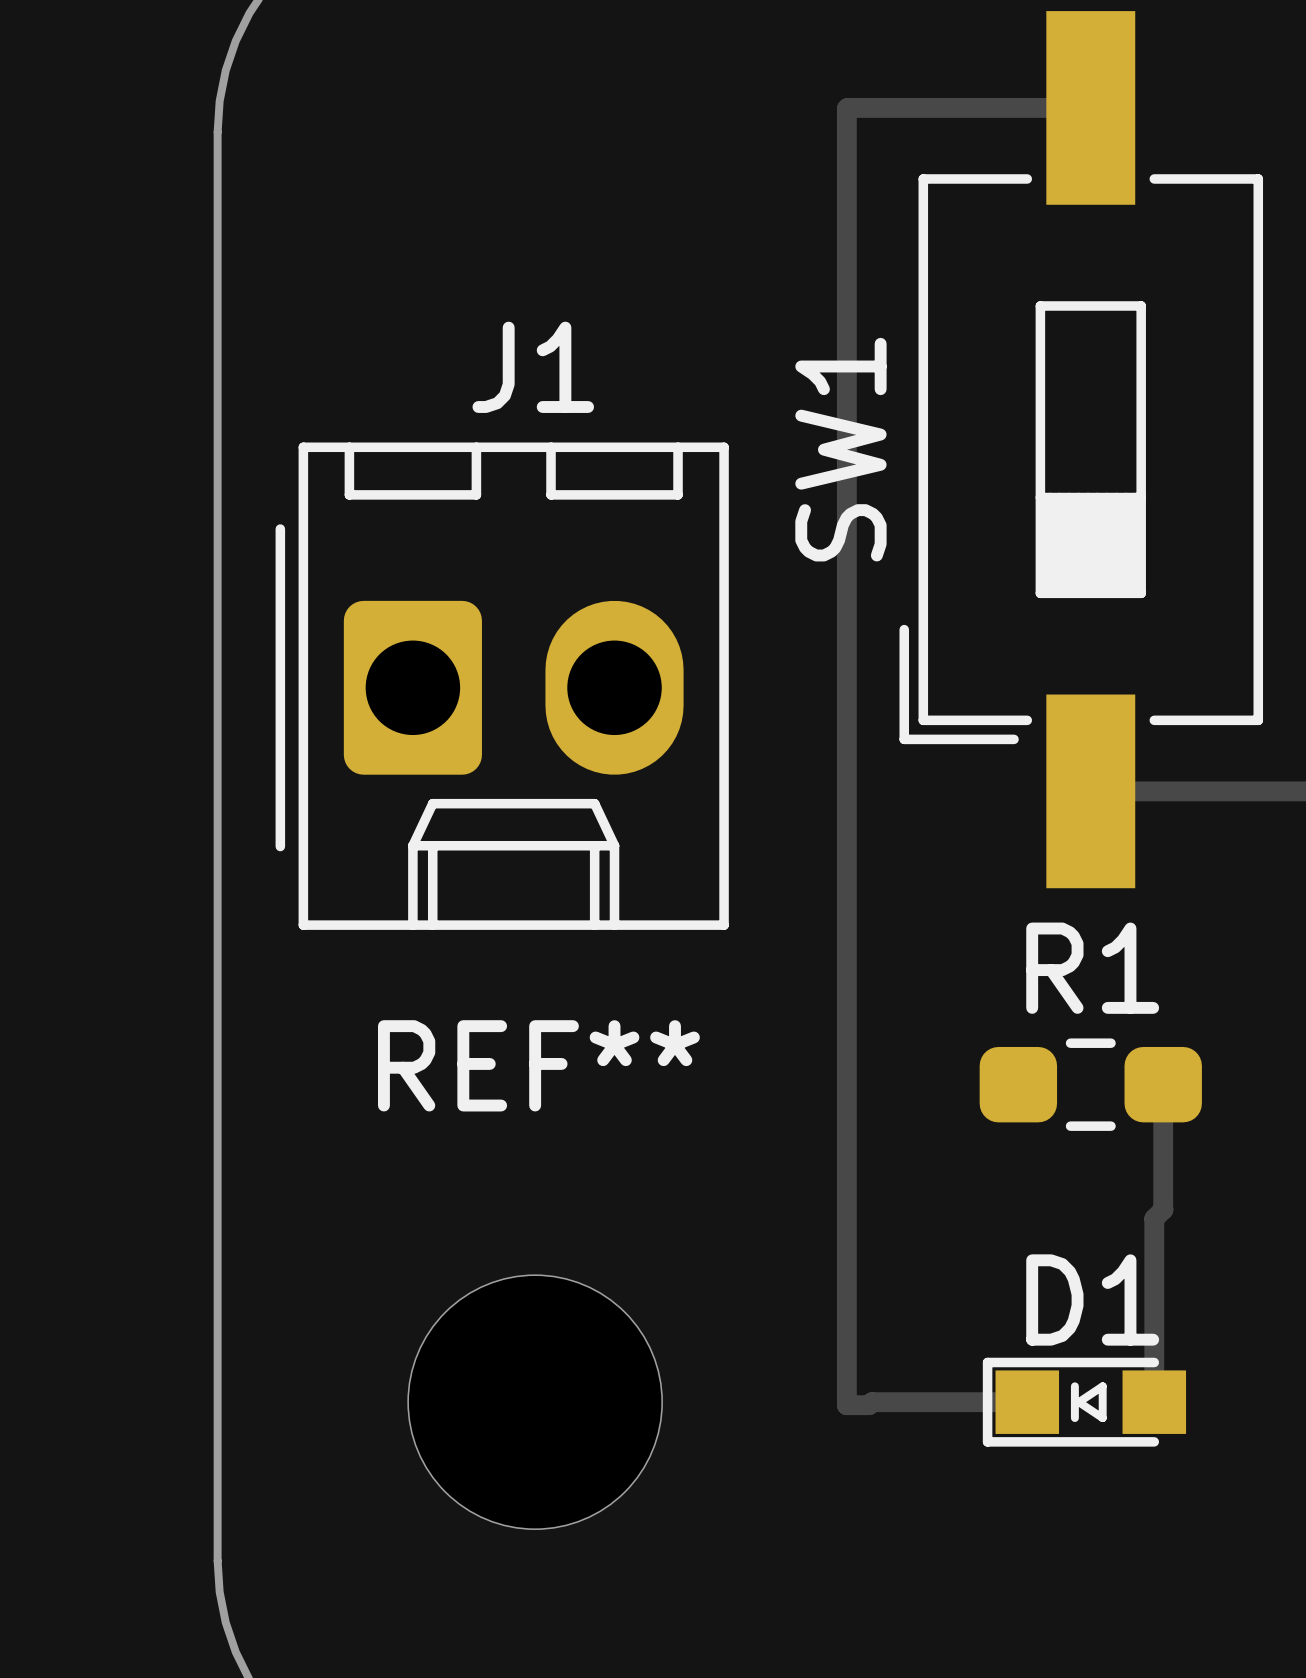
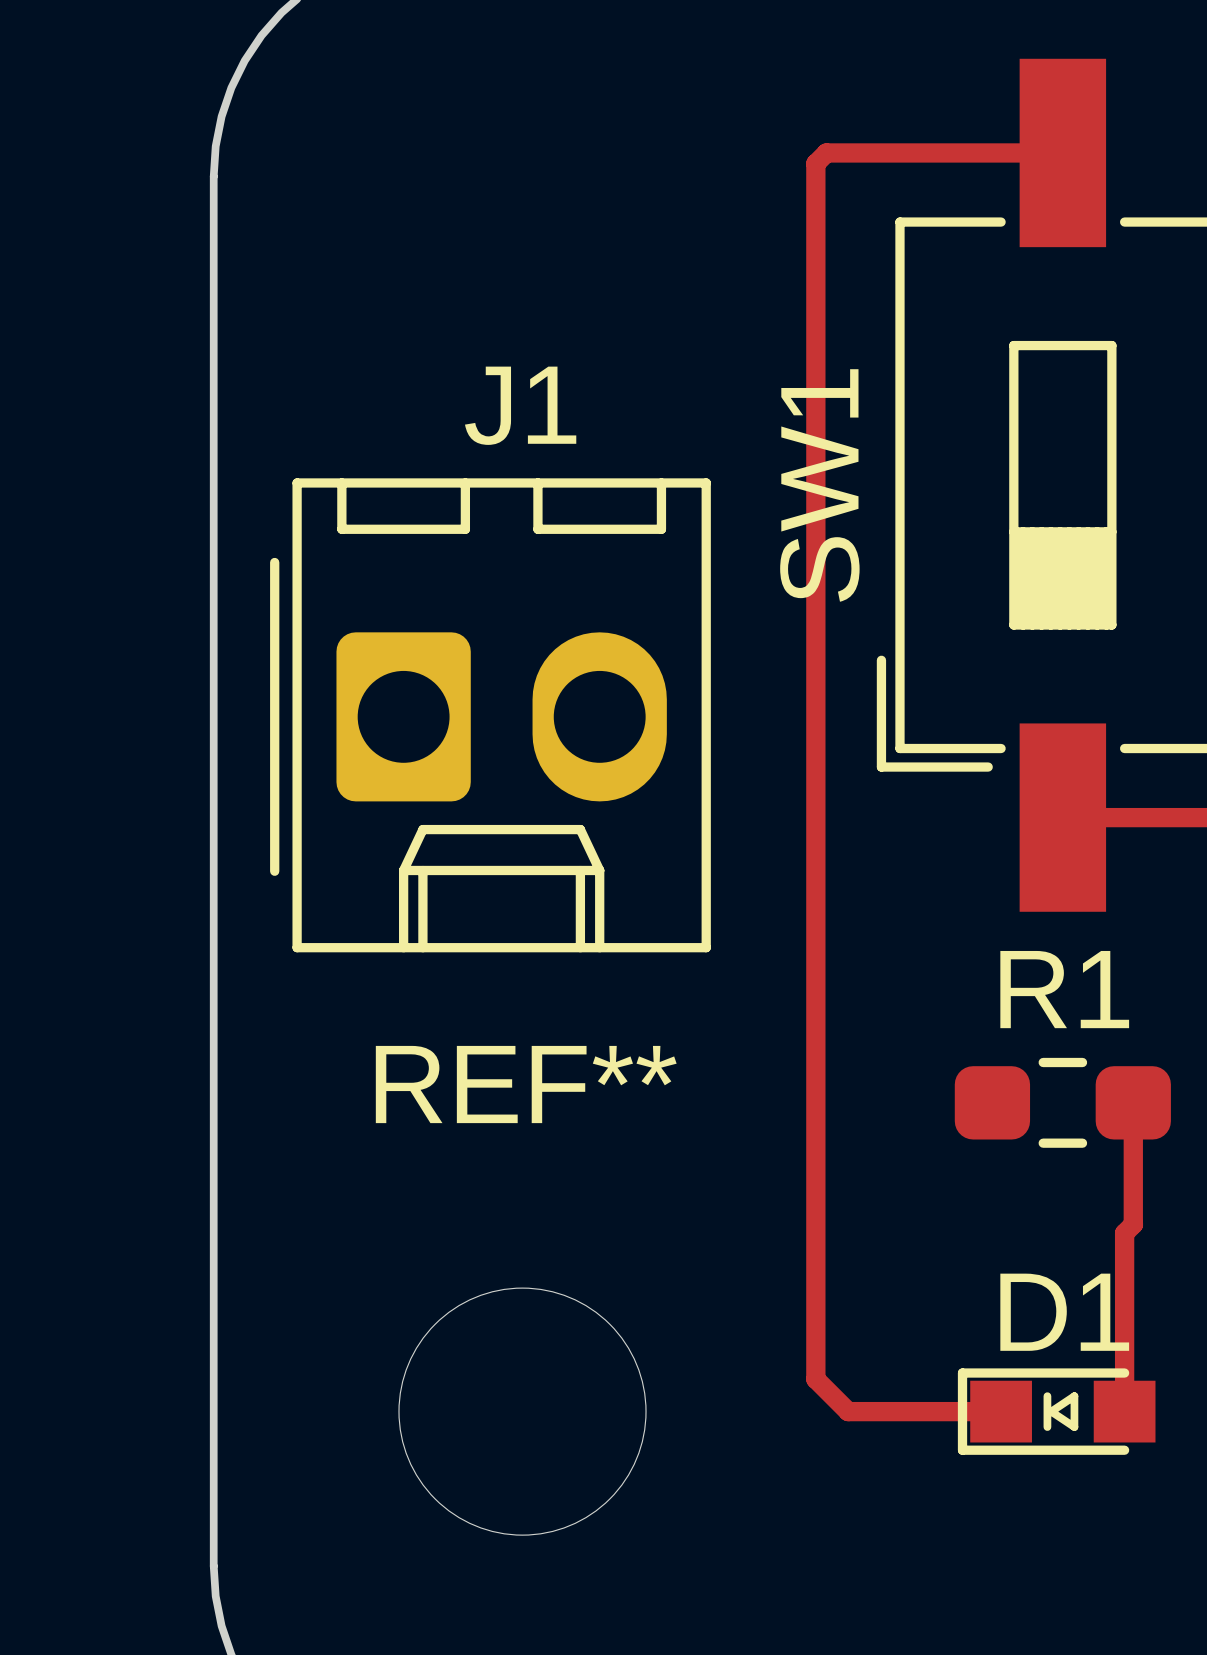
track: (846, 108) (846, 1405) (869, 1405) (872, 1402) -> (825, 153) (815, 163) (815, 1379) (850, 1411)

